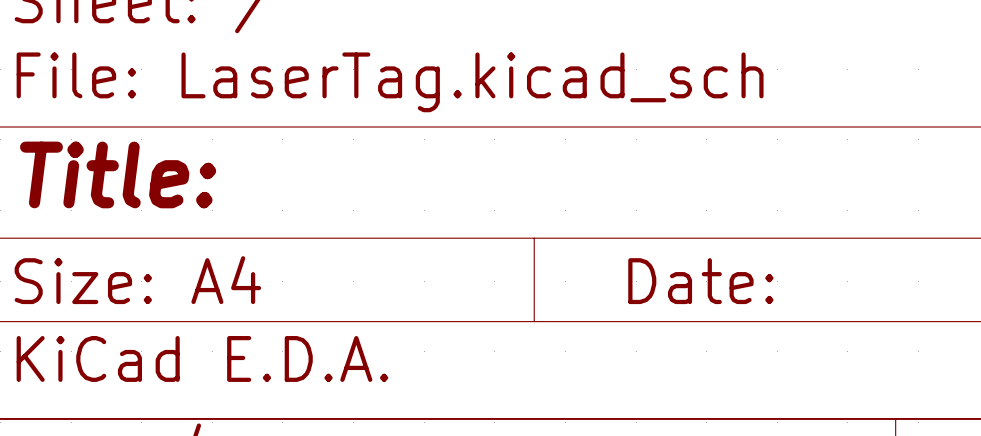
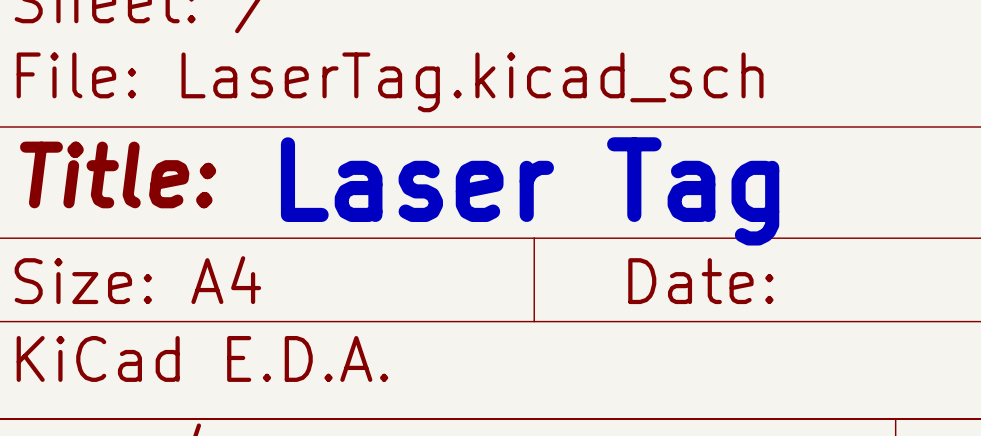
text: none -> Laser Tag (530, 191)

